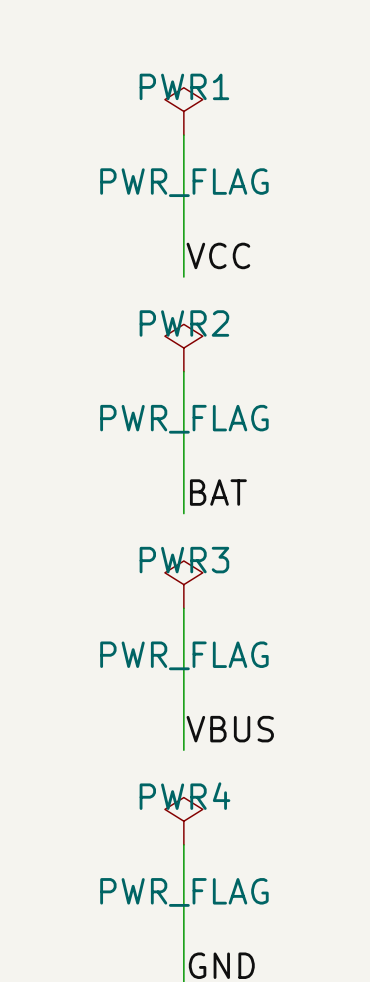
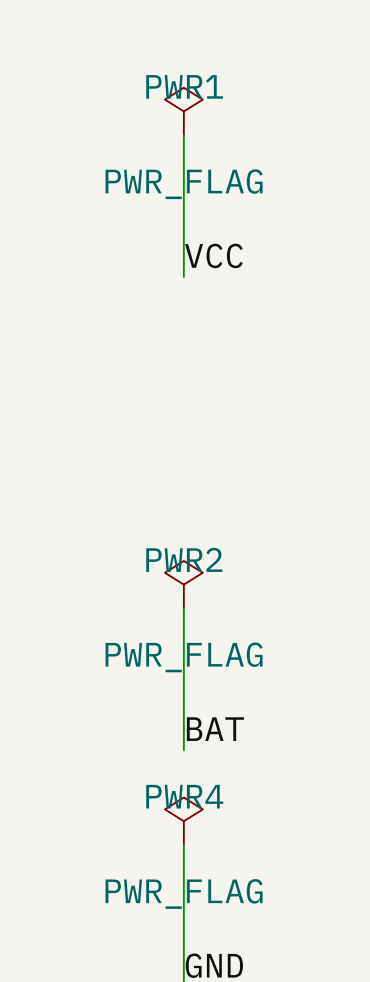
PWR2: PWR_FLAG (183, 348) -> none
wire: (183, 371) (183, 513) -> none
label: BAT (218, 492) -> none
PWR3 name: PWR3 (184, 560) -> PWR2 (184, 559)
label: VBUS (230, 729) -> BAT (215, 729)

